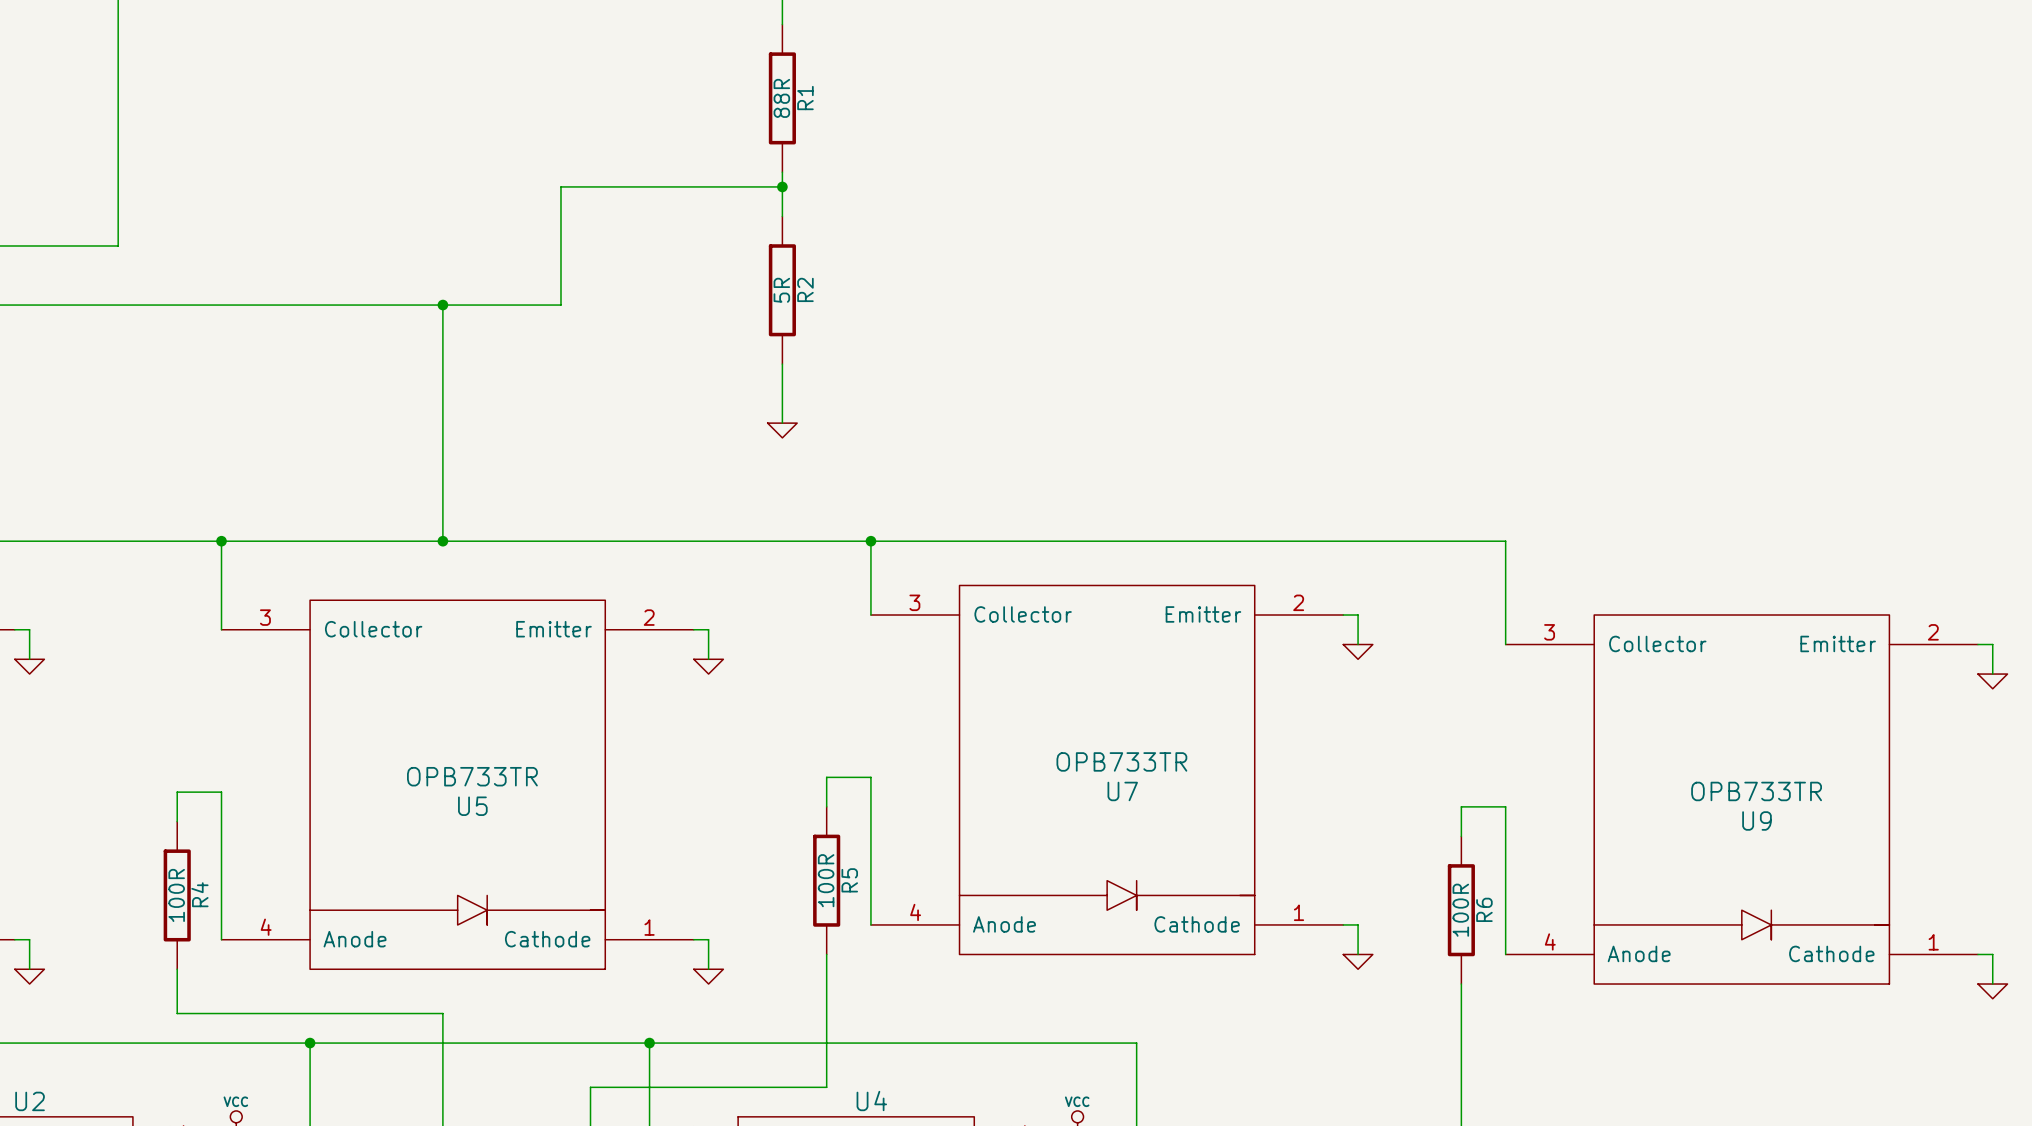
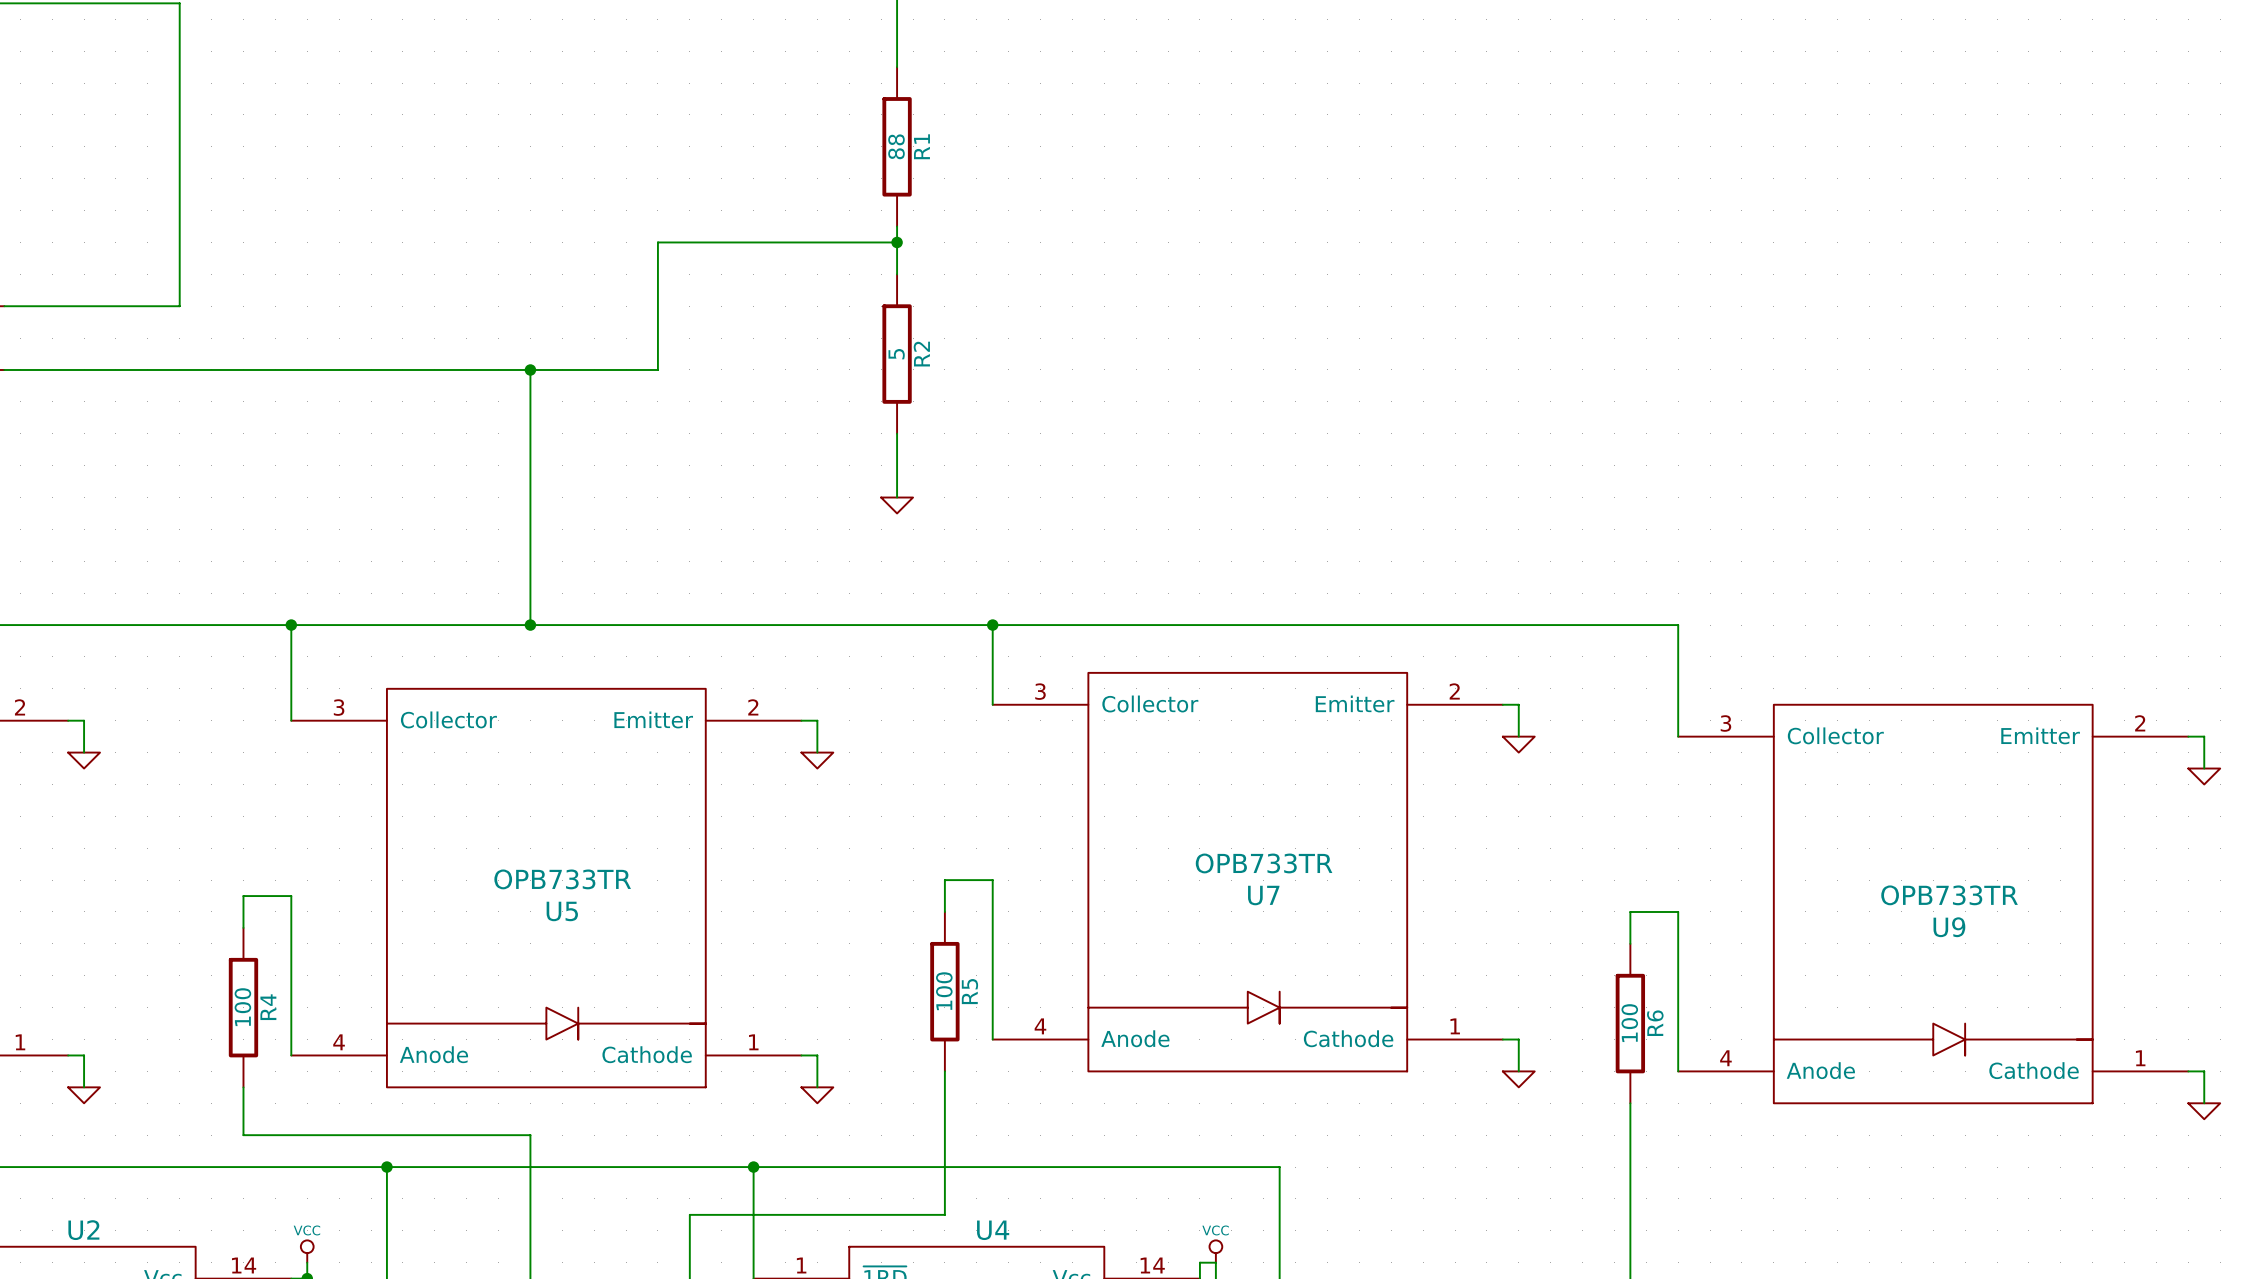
R1 value: 88R (781, 98) -> 88 (896, 146)
R2 value: 5R (781, 290) -> 5 (896, 354)
R5 value: 100R (826, 880) -> 100 (944, 991)
R4 value: 100R (176, 895) -> 100 (242, 1007)
R6 value: 100R (1460, 910) -> 100 (1629, 1023)

